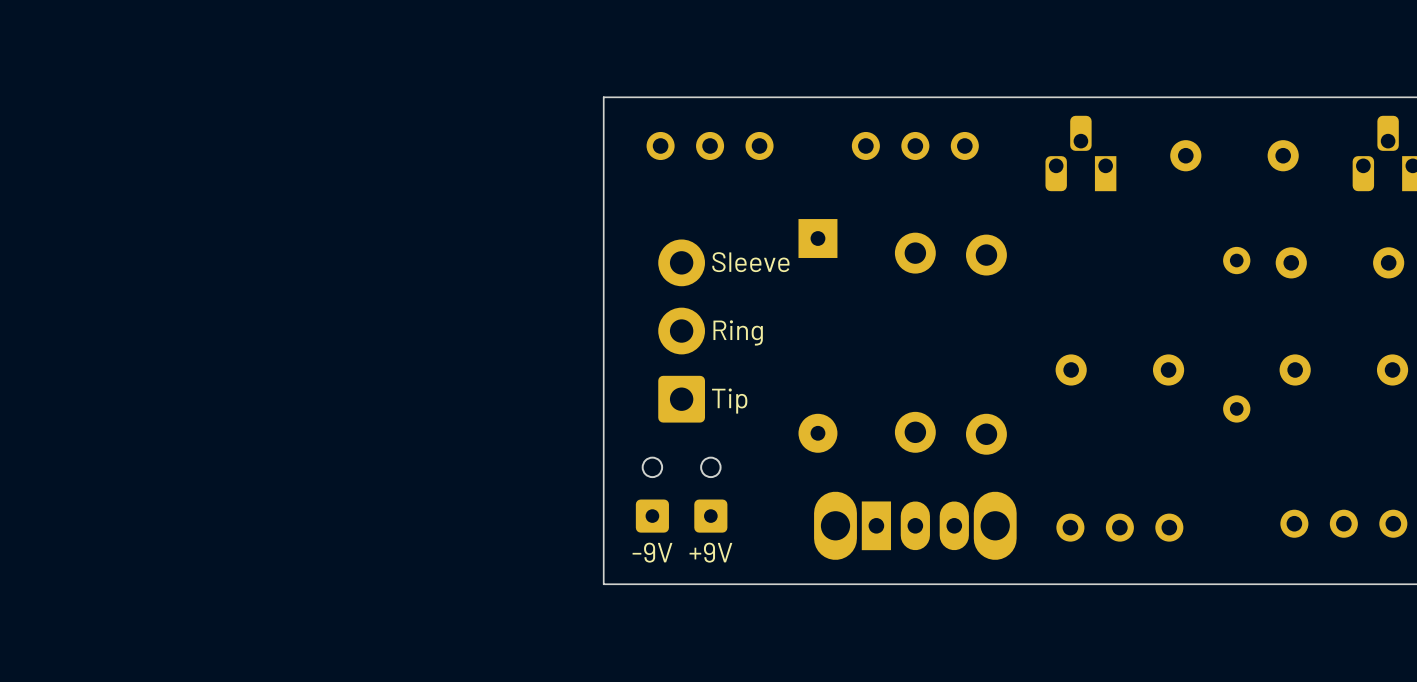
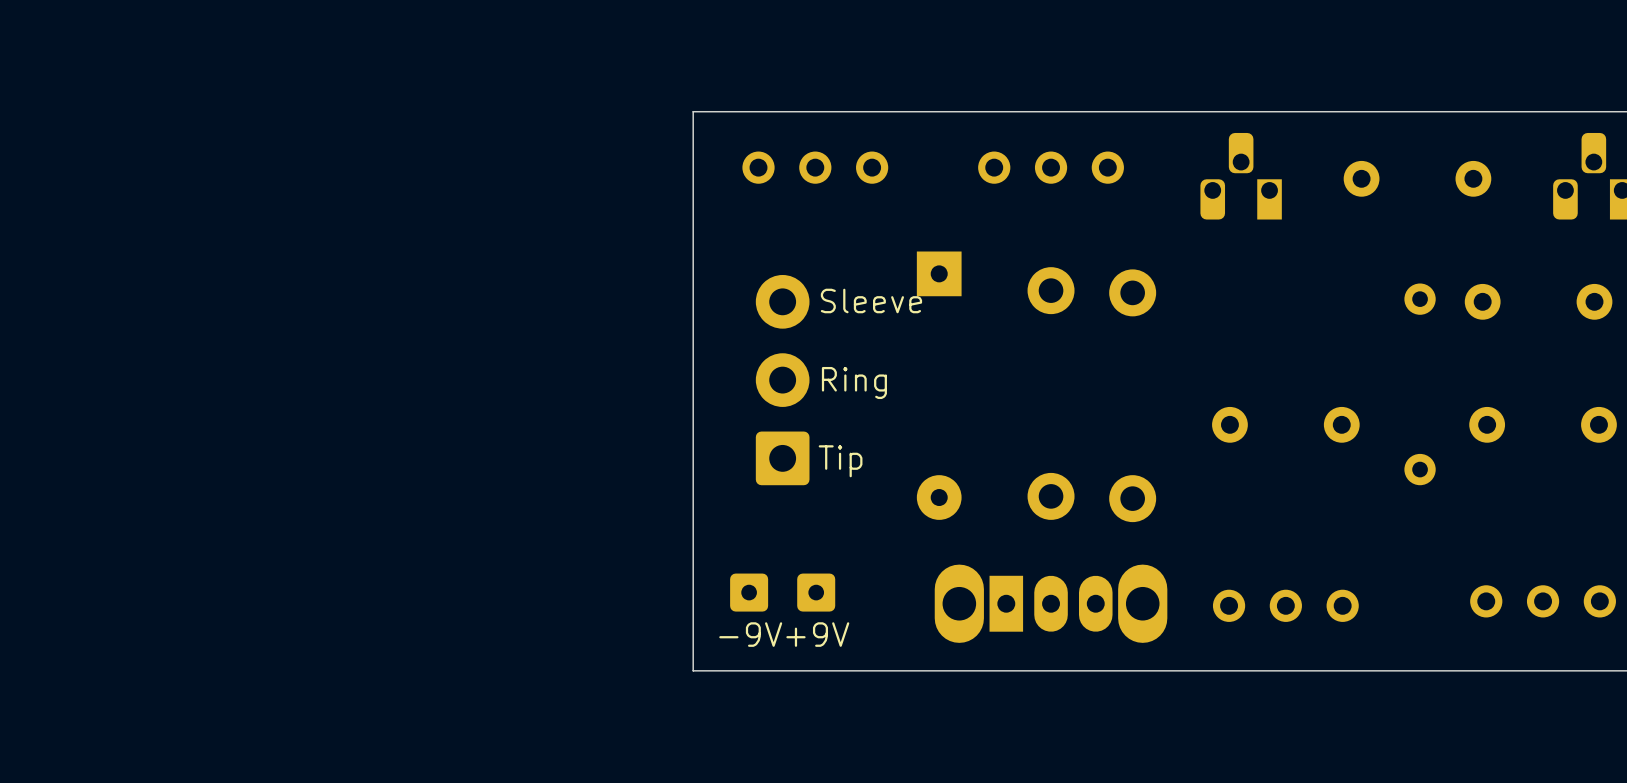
round board edge: [641, 456, 664, 479] -> none
round board edge: [700, 456, 722, 479] -> none

